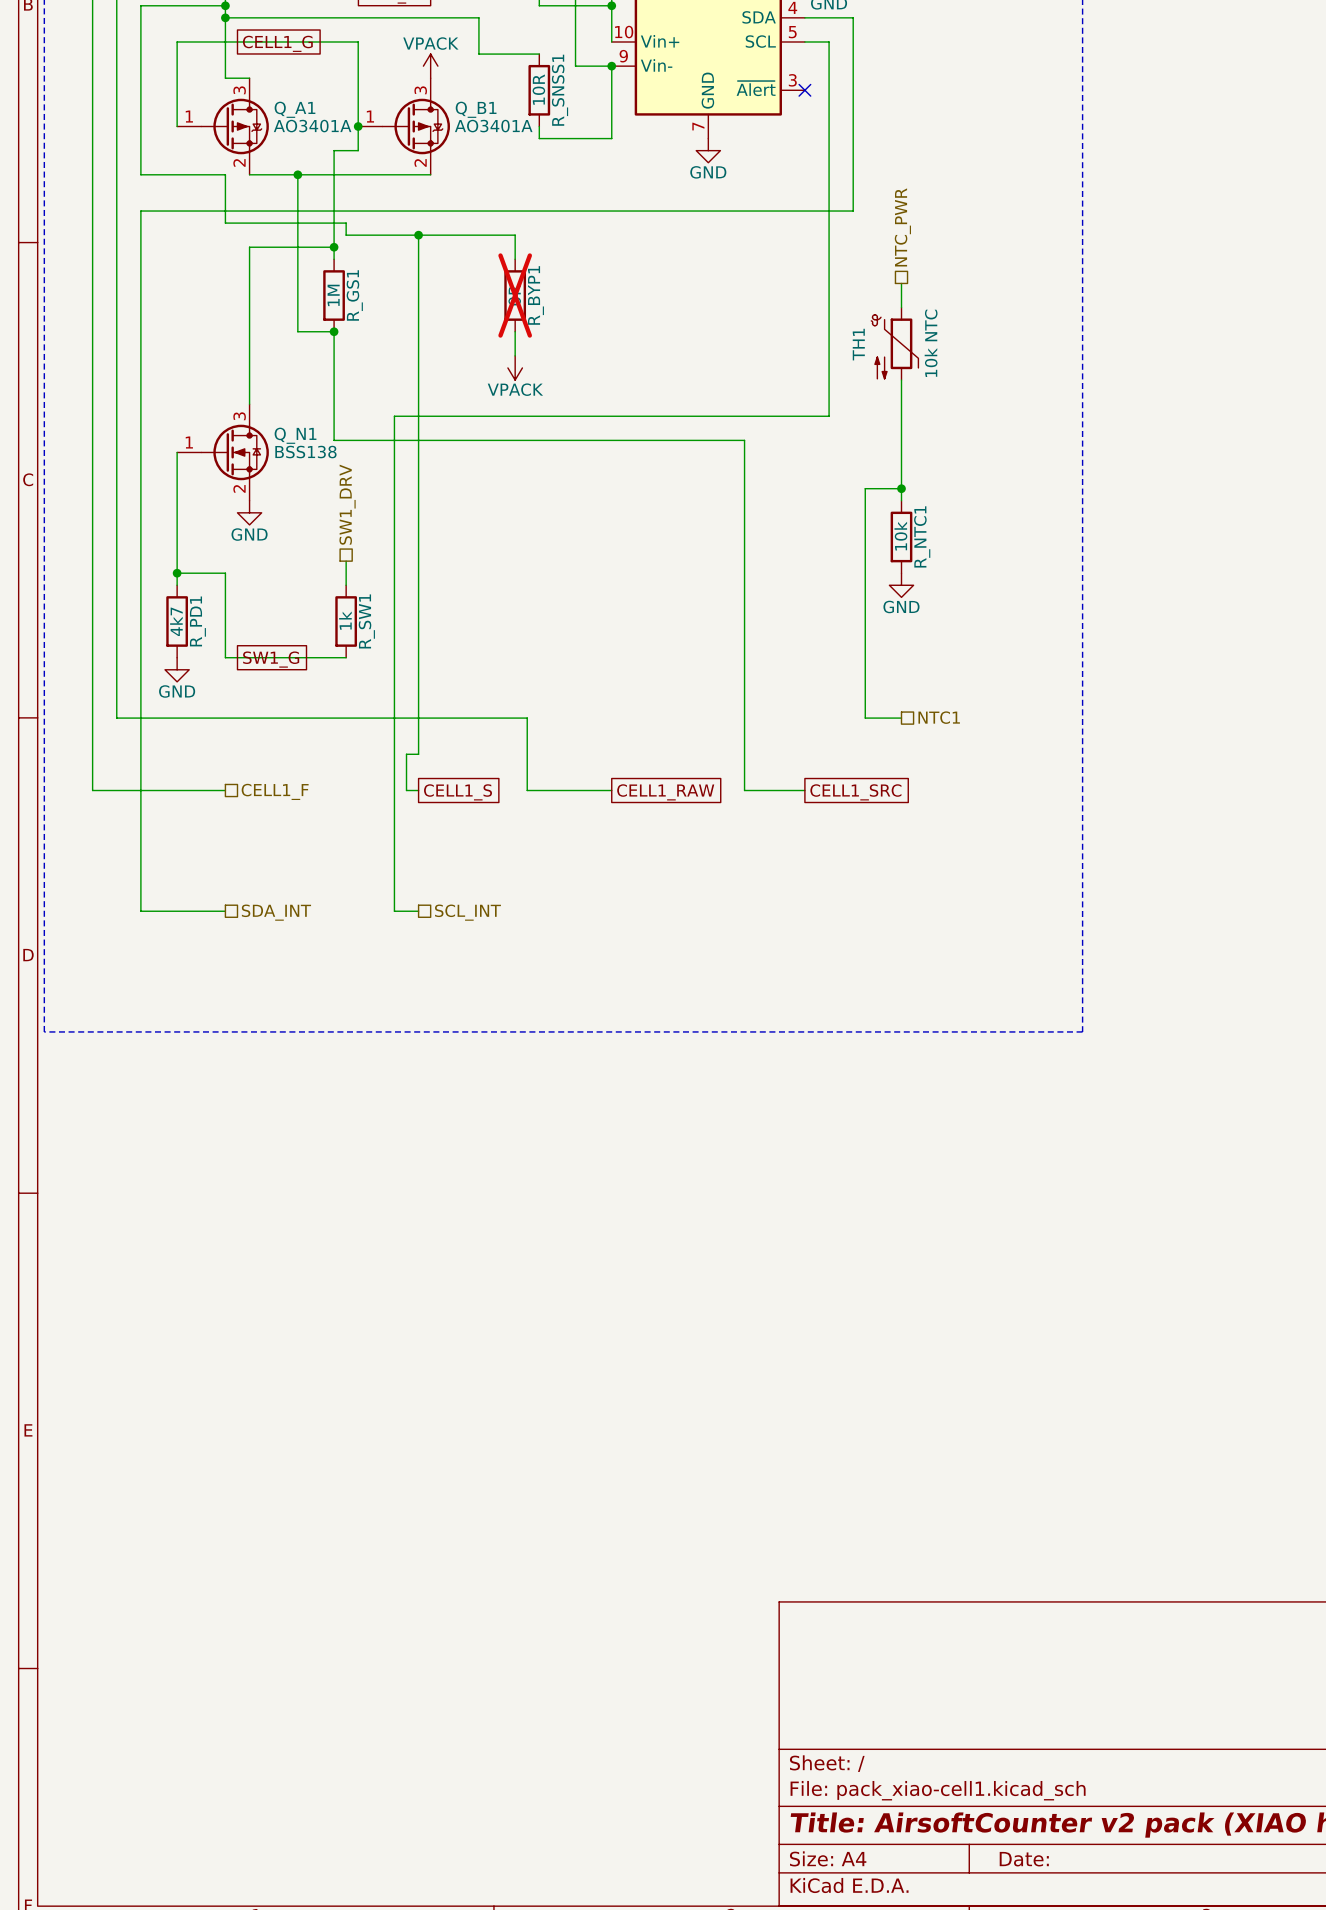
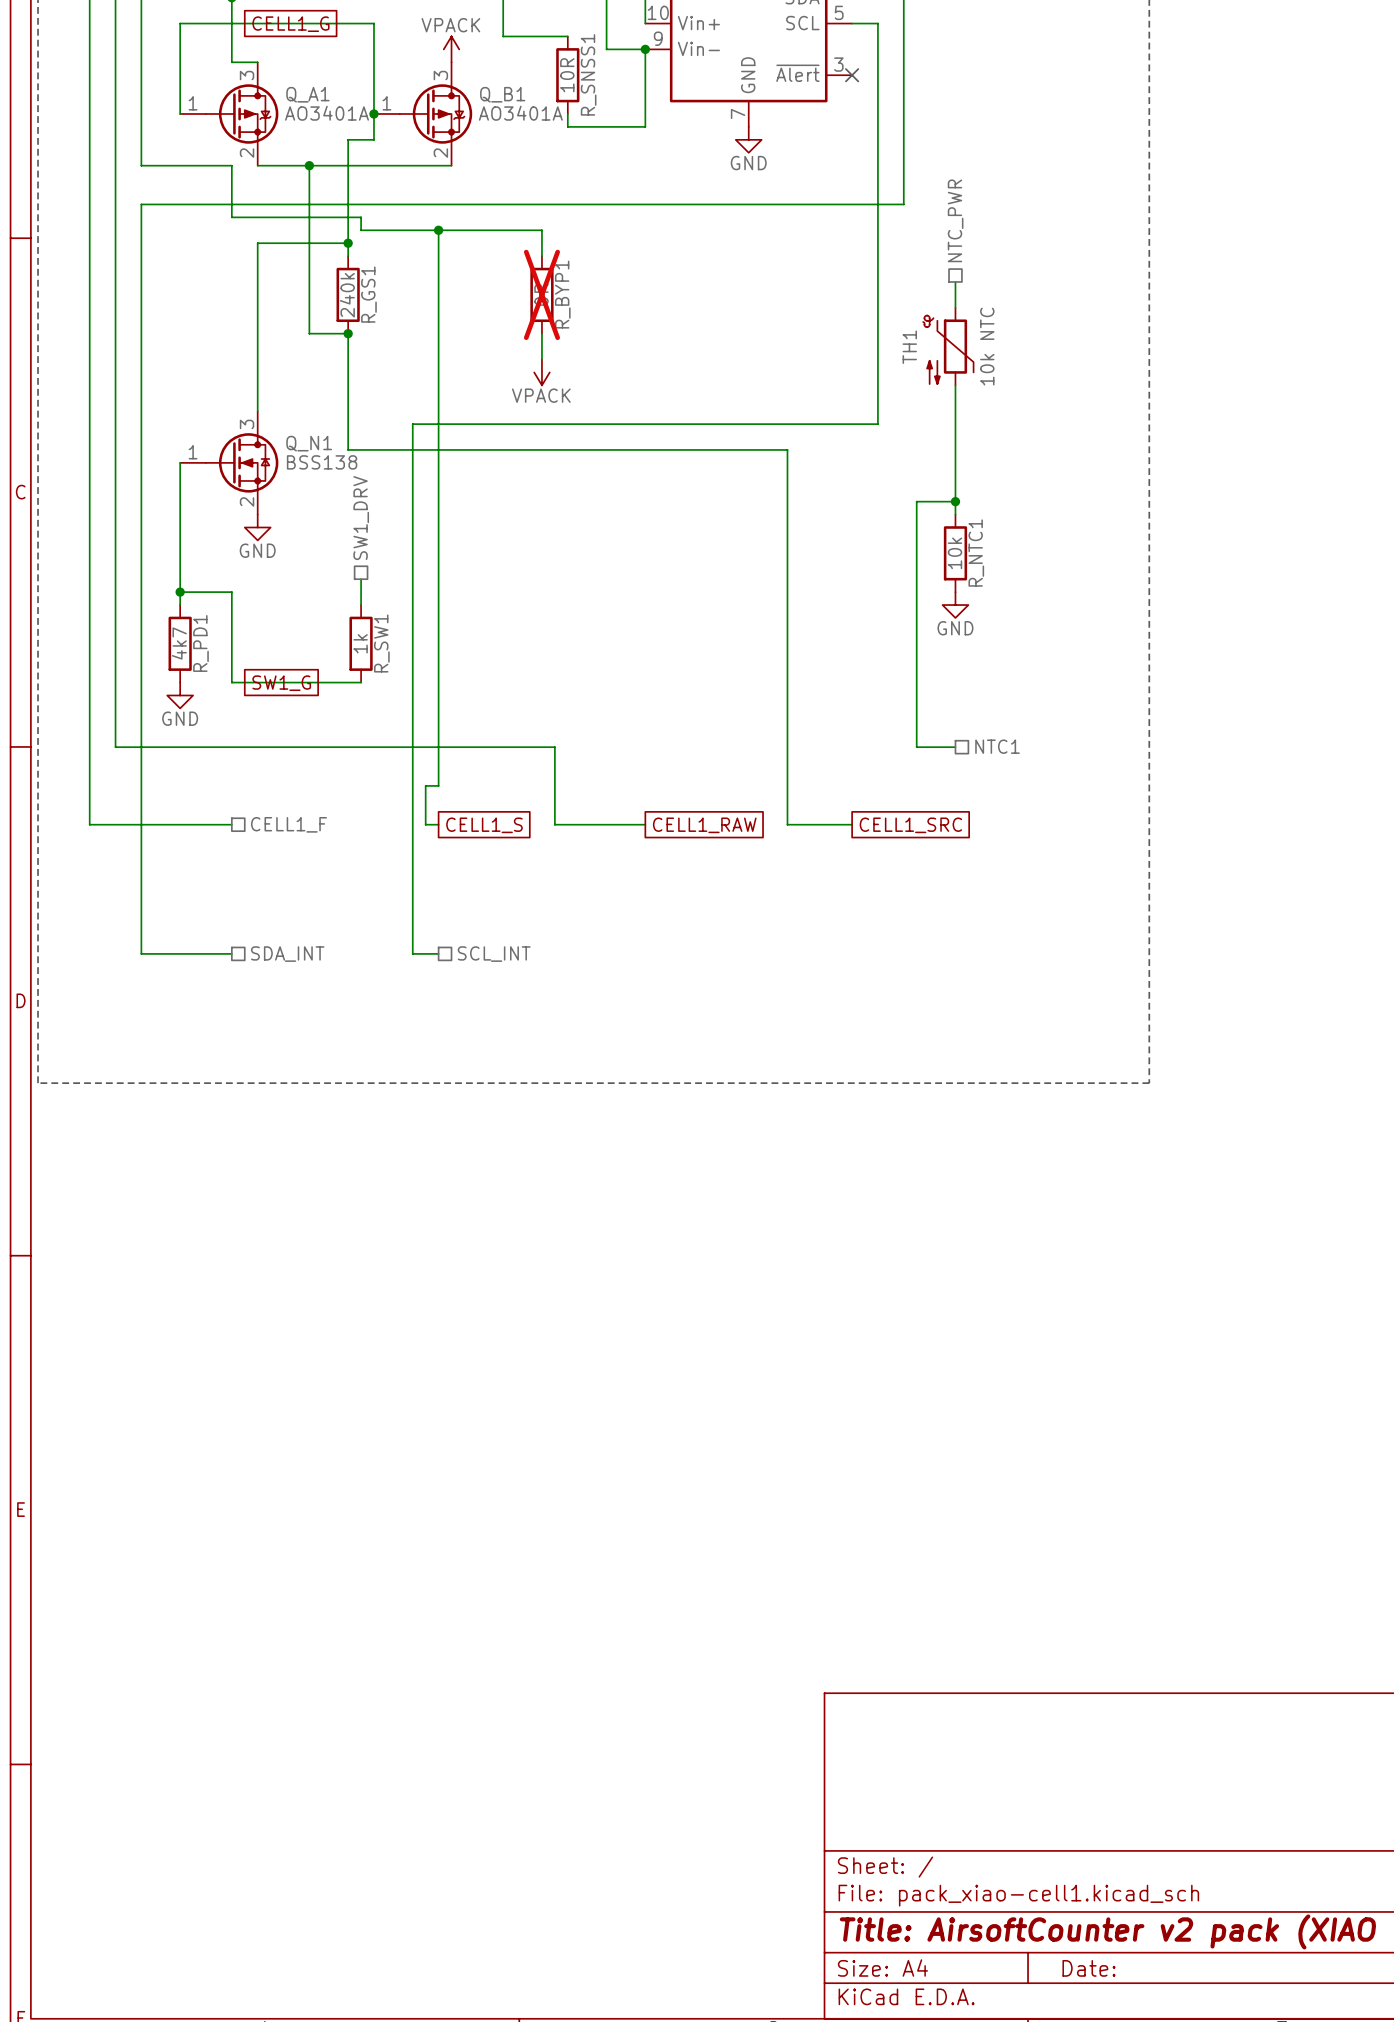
R_GS1 value: 1M (333, 295) -> 240k (347, 295)

